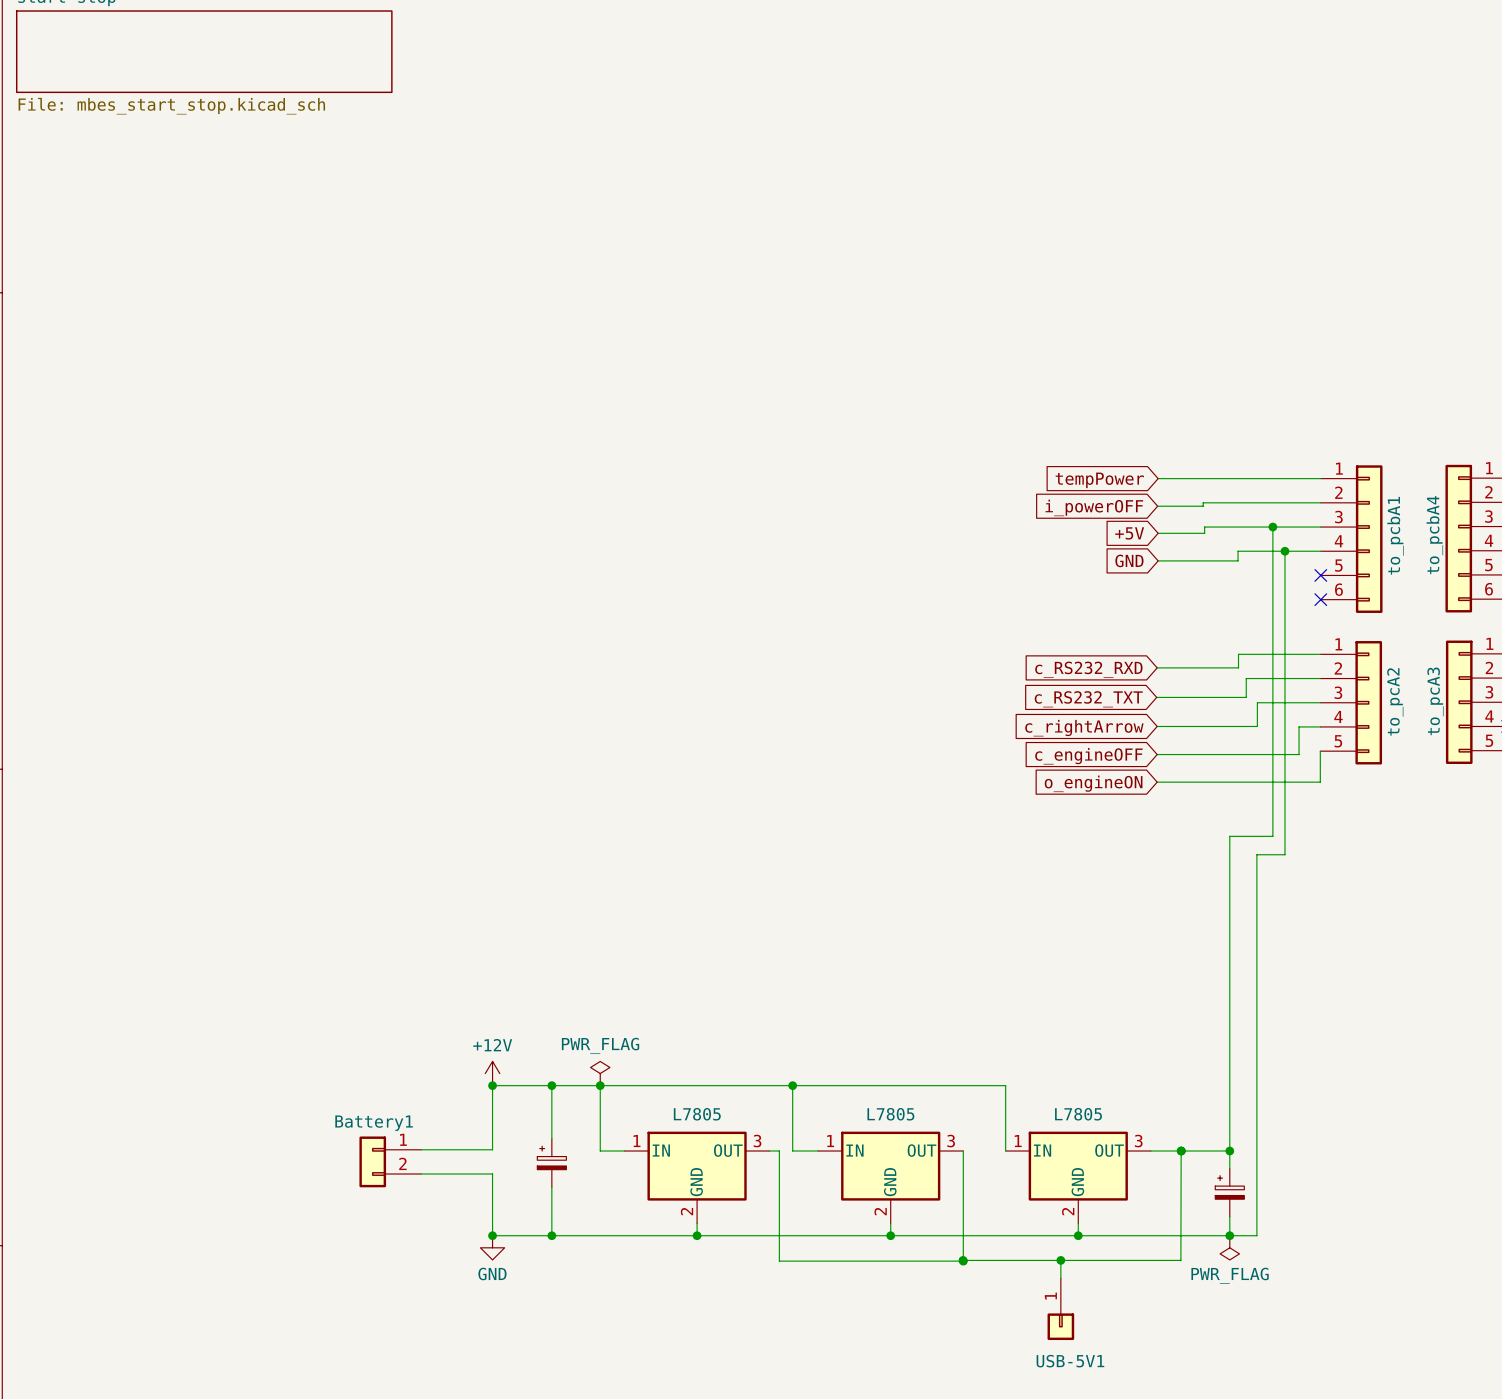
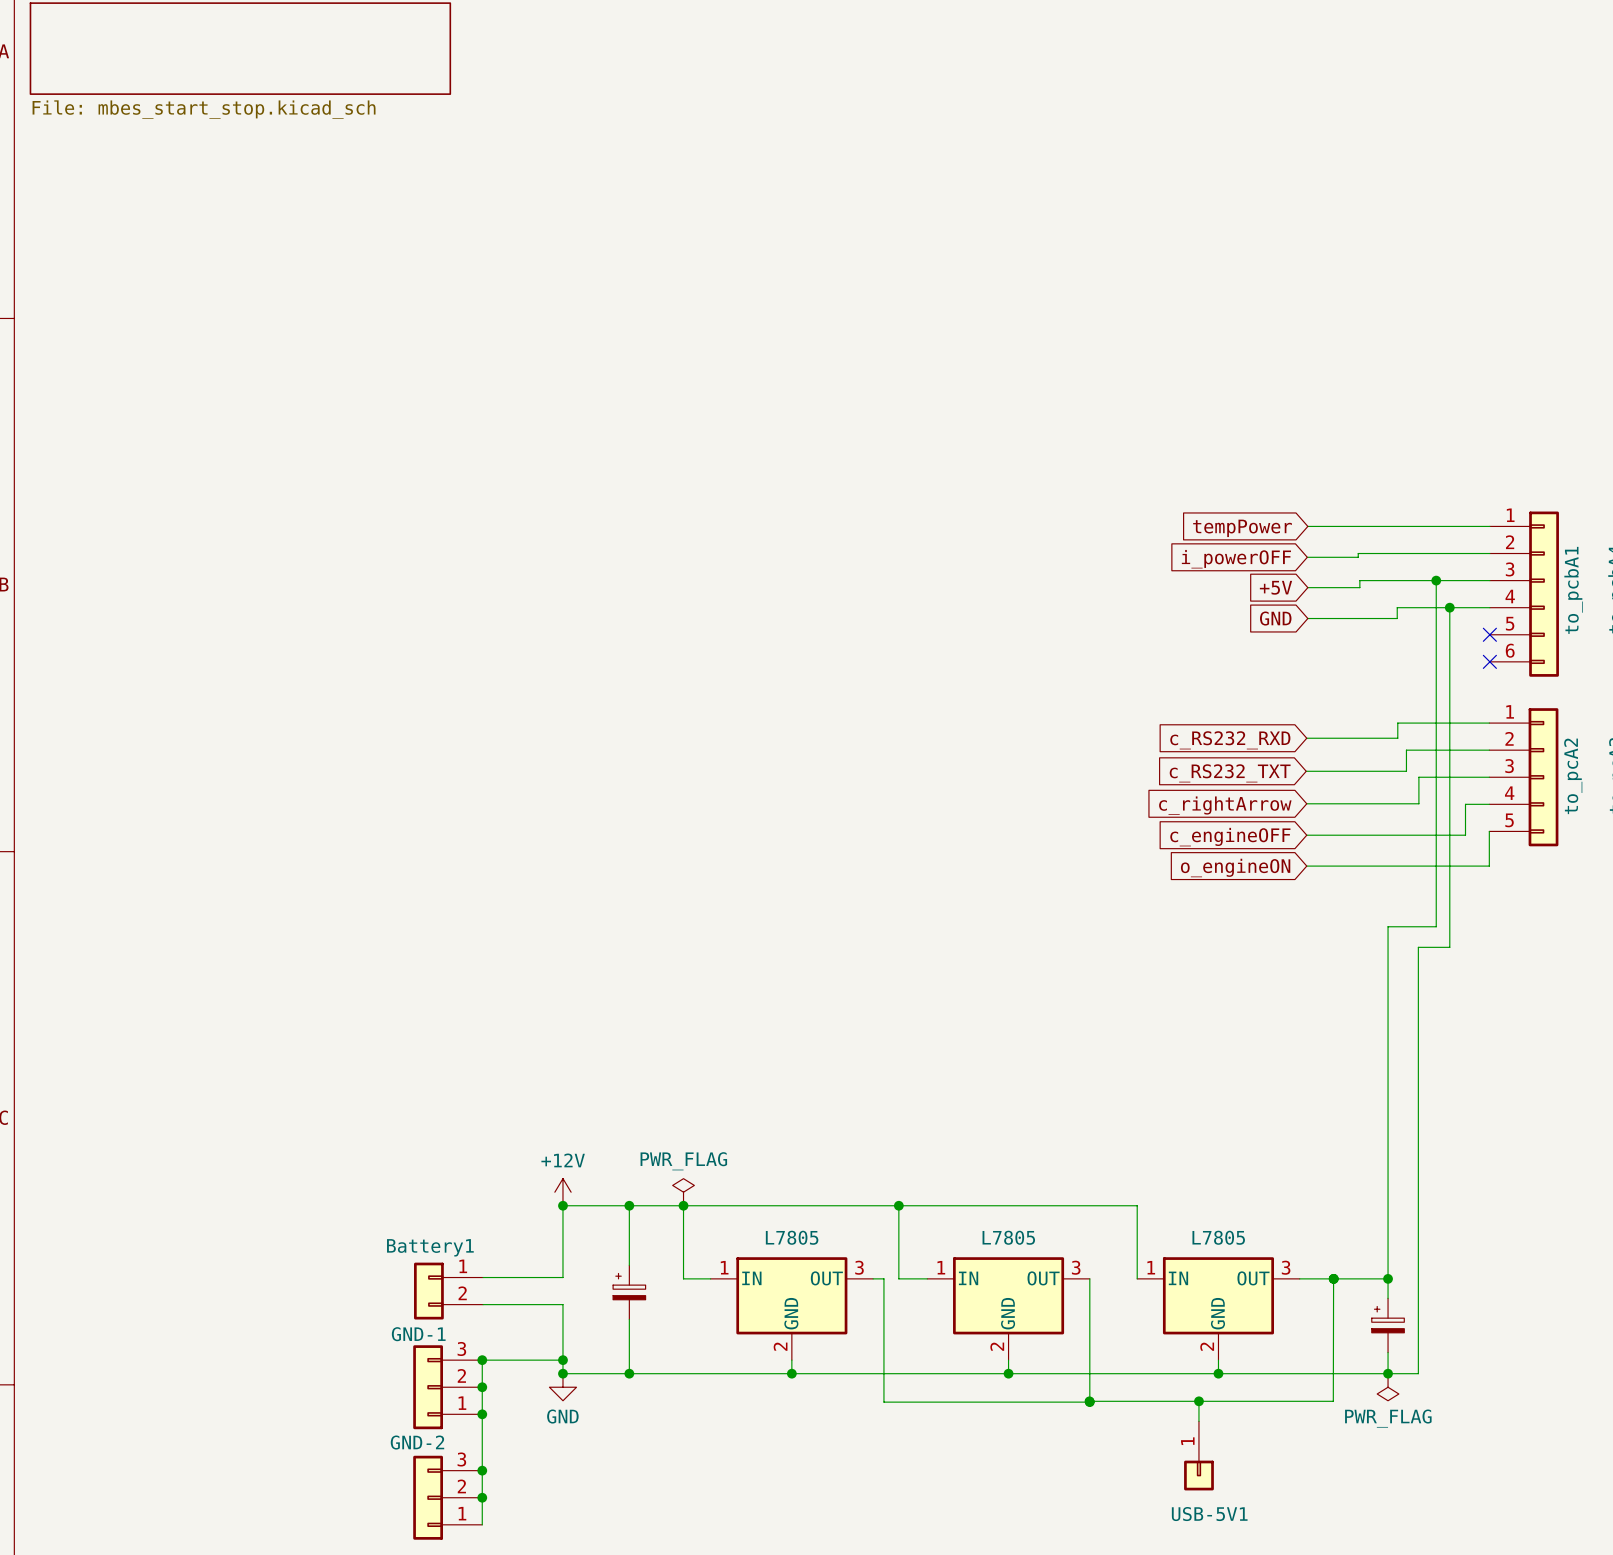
junction: none -> (482, 1360)
wire: none -> (562, 1360) (482, 1360) (482, 1524)
junction: none -> (562, 1360)
GND-1: none -> (447, 1387)
junction: none -> (482, 1387)
junction: none -> (482, 1414)
junction: none -> (482, 1470)
GND-2: none -> (447, 1497)
junction: none -> (482, 1497)

